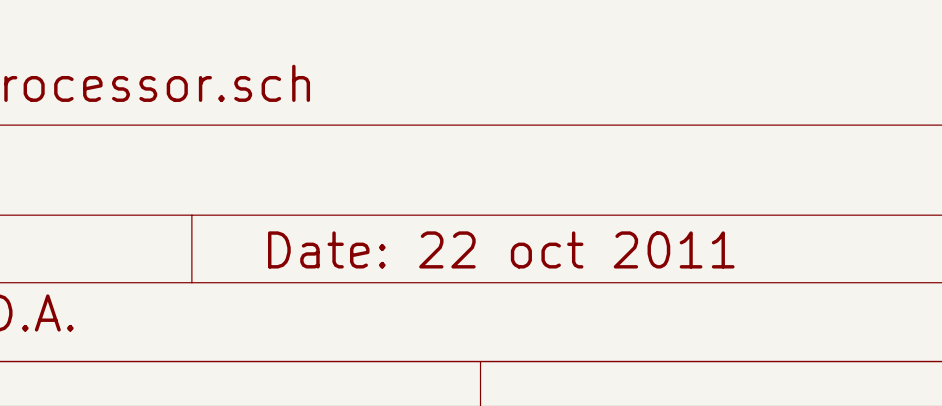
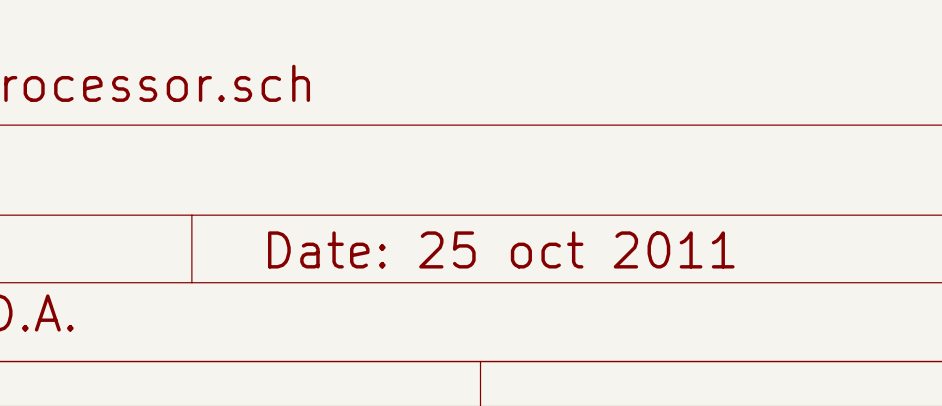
title block: Date: 22 oct 2011 (501, 249) -> Date: 25 oct 2011 (501, 249)

